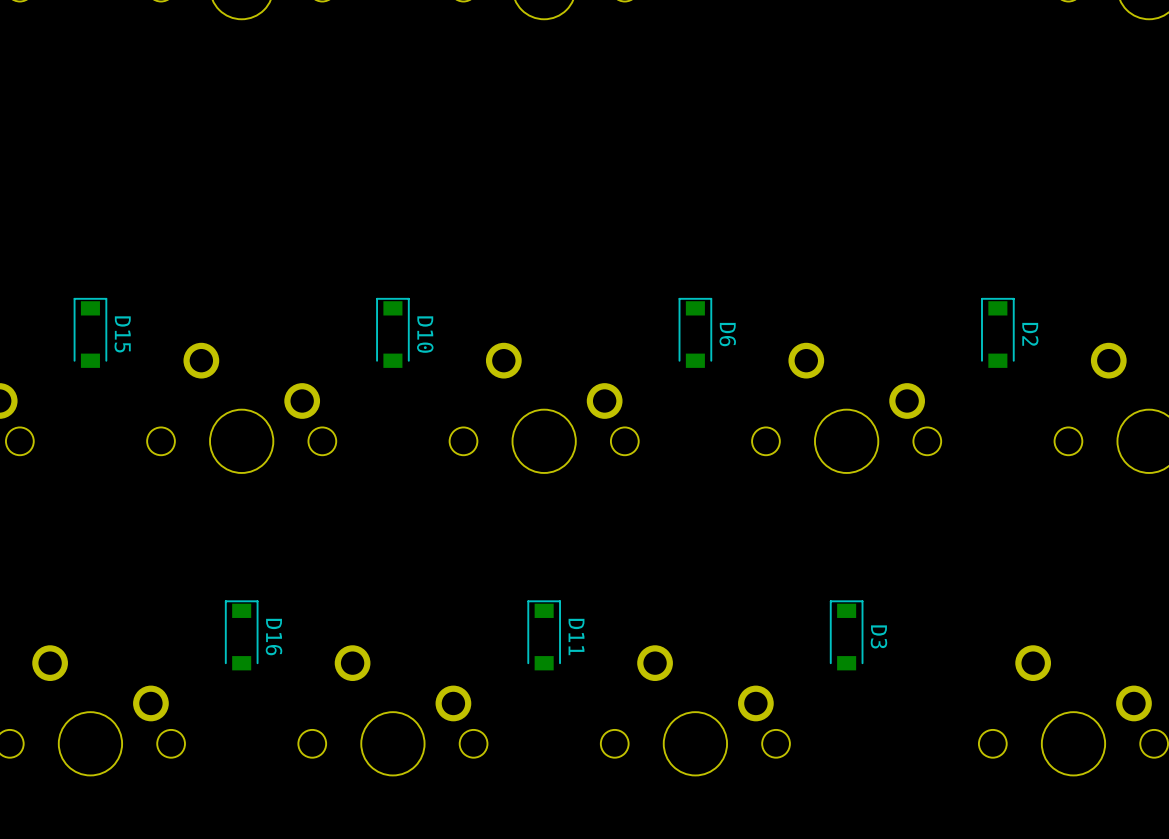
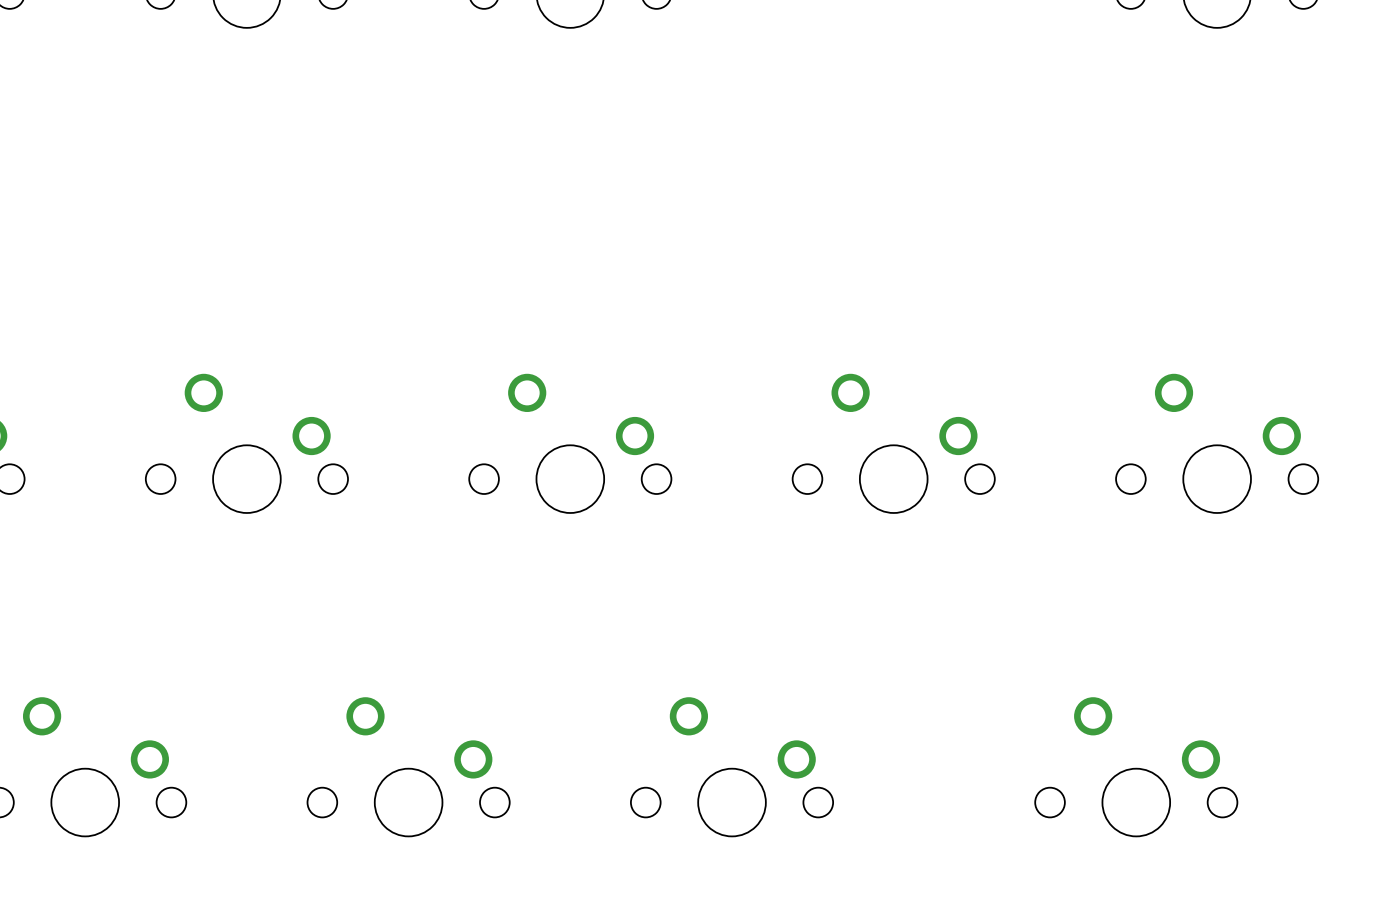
D15: (90, 332) -> none
D10: (392, 332) -> none
D6: (695, 332) -> none
D2: (997, 332) -> none
D16: (241, 635) -> none
D11: (544, 635) -> none
D3: (846, 635) -> none

